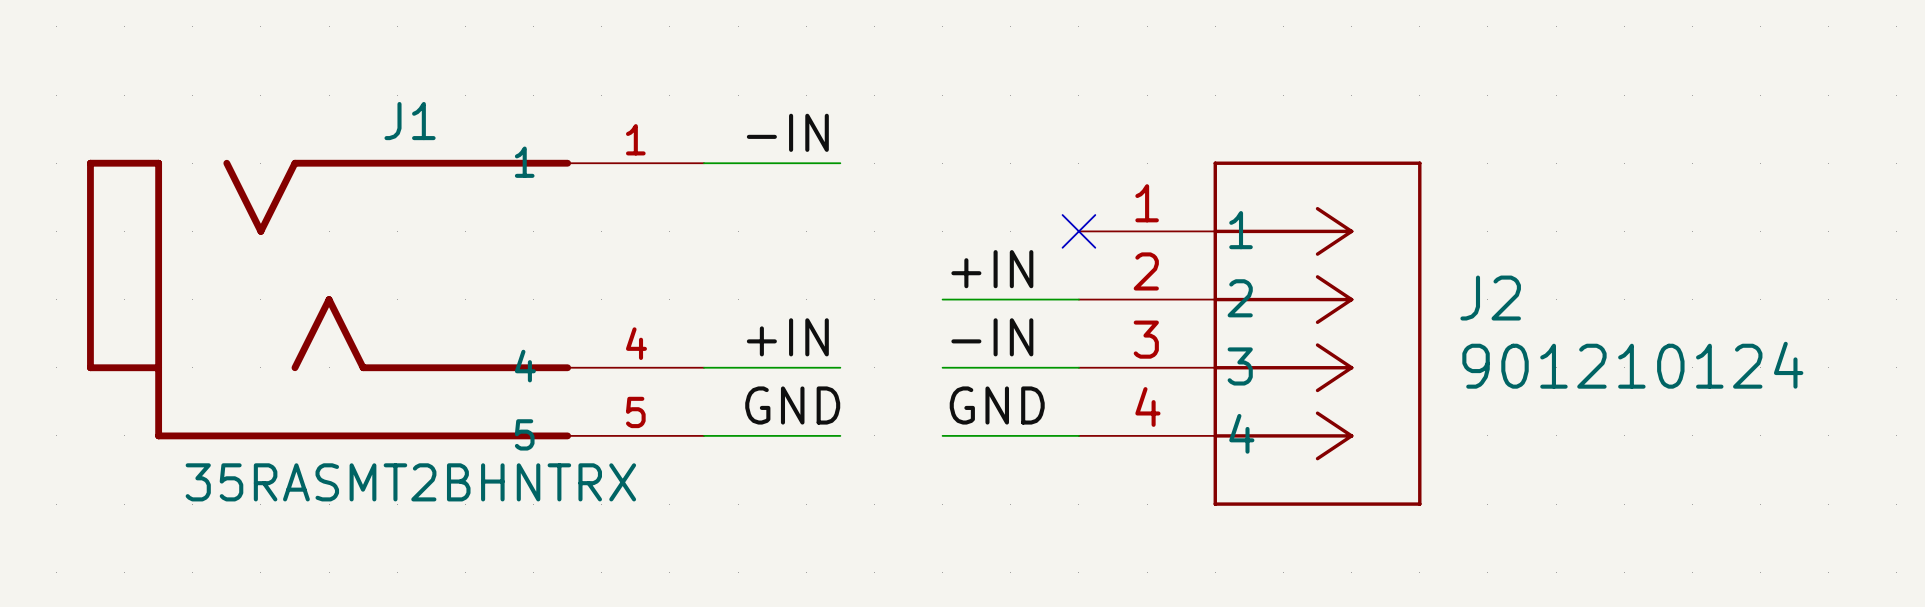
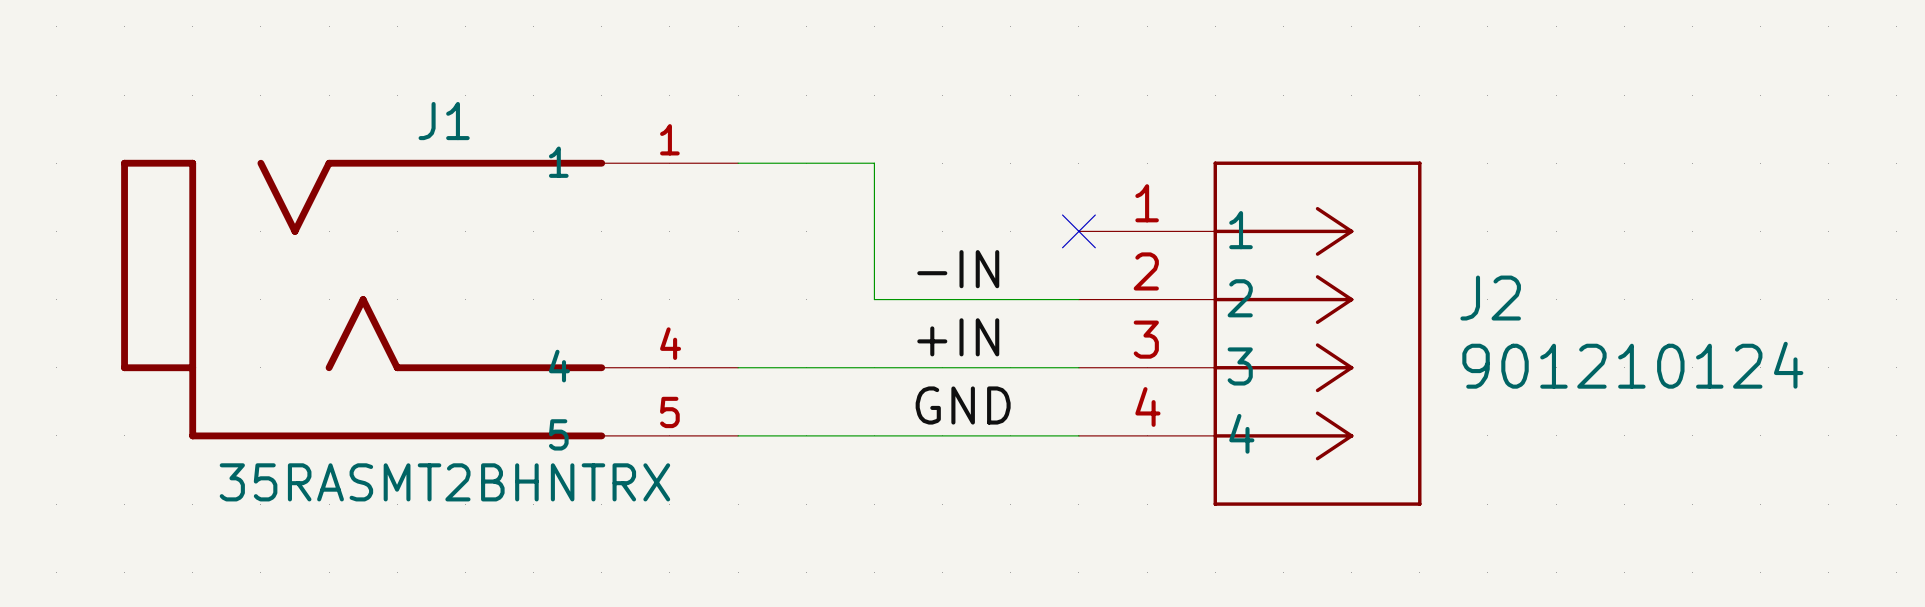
label: -IN (787, 132) -> none
wire: none -> (840, 163) (874, 163) (874, 299) (942, 299)
label position: +IN (992, 269) -> +IN (958, 337)
J1 position: (395, 299) -> (429, 299)
label: +IN (787, 337) -> none
label position: -IN (992, 337) -> -IN (958, 269)
wire: none -> (840, 367) (942, 367)
label: GND (792, 405) -> none
label position: GND (997, 405) -> GND (963, 405)
wire: none -> (840, 435) (942, 435)

